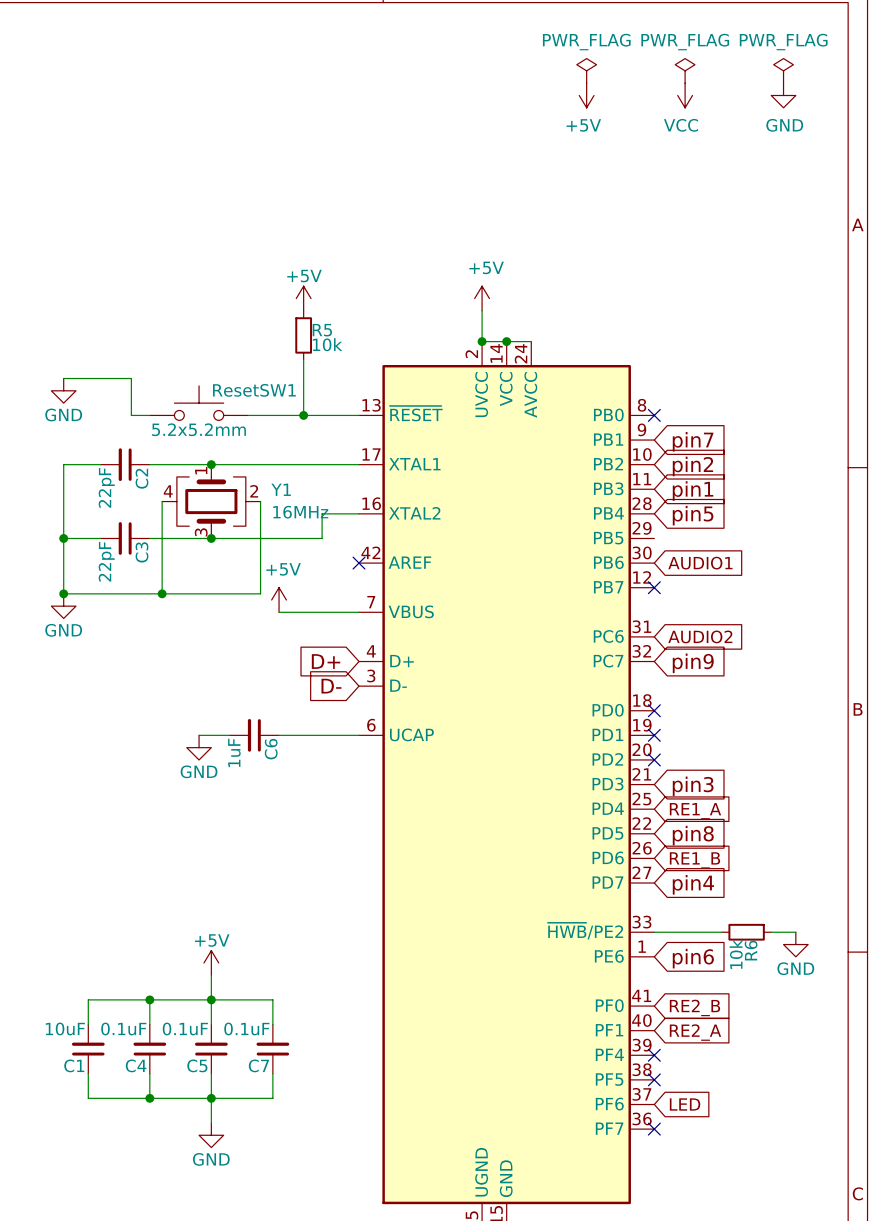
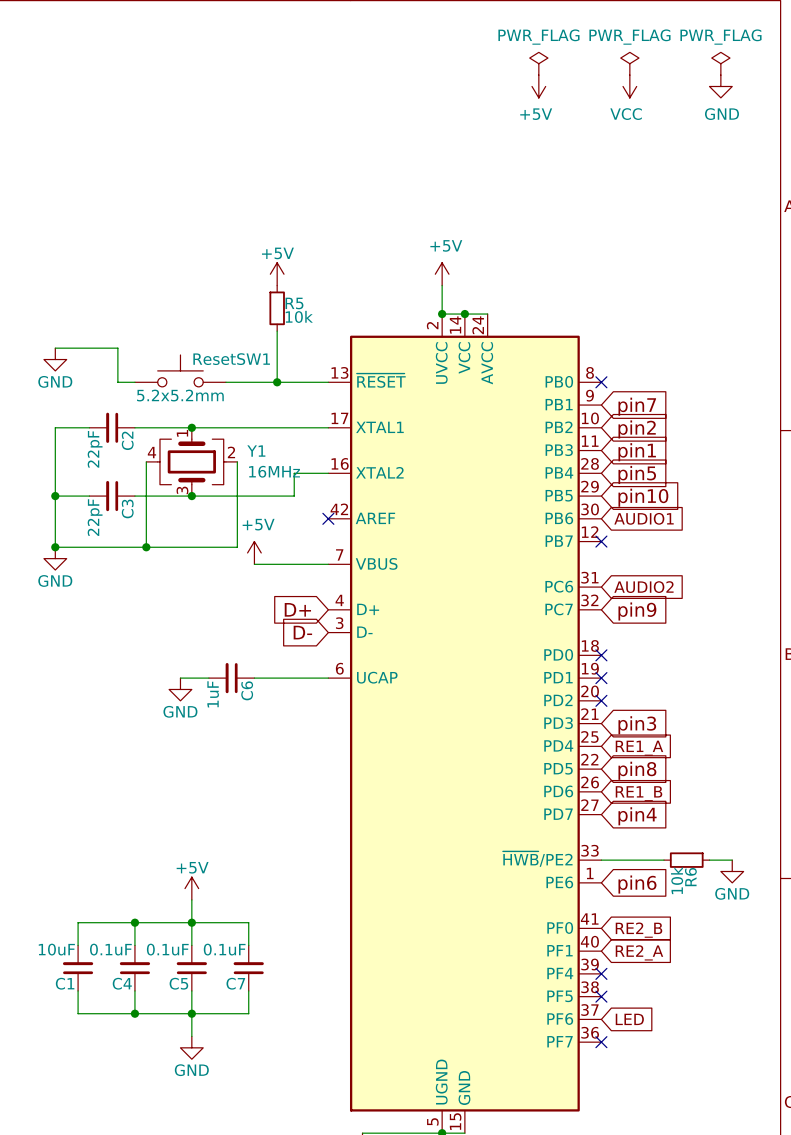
global label: none -> pin10 (643, 497)

